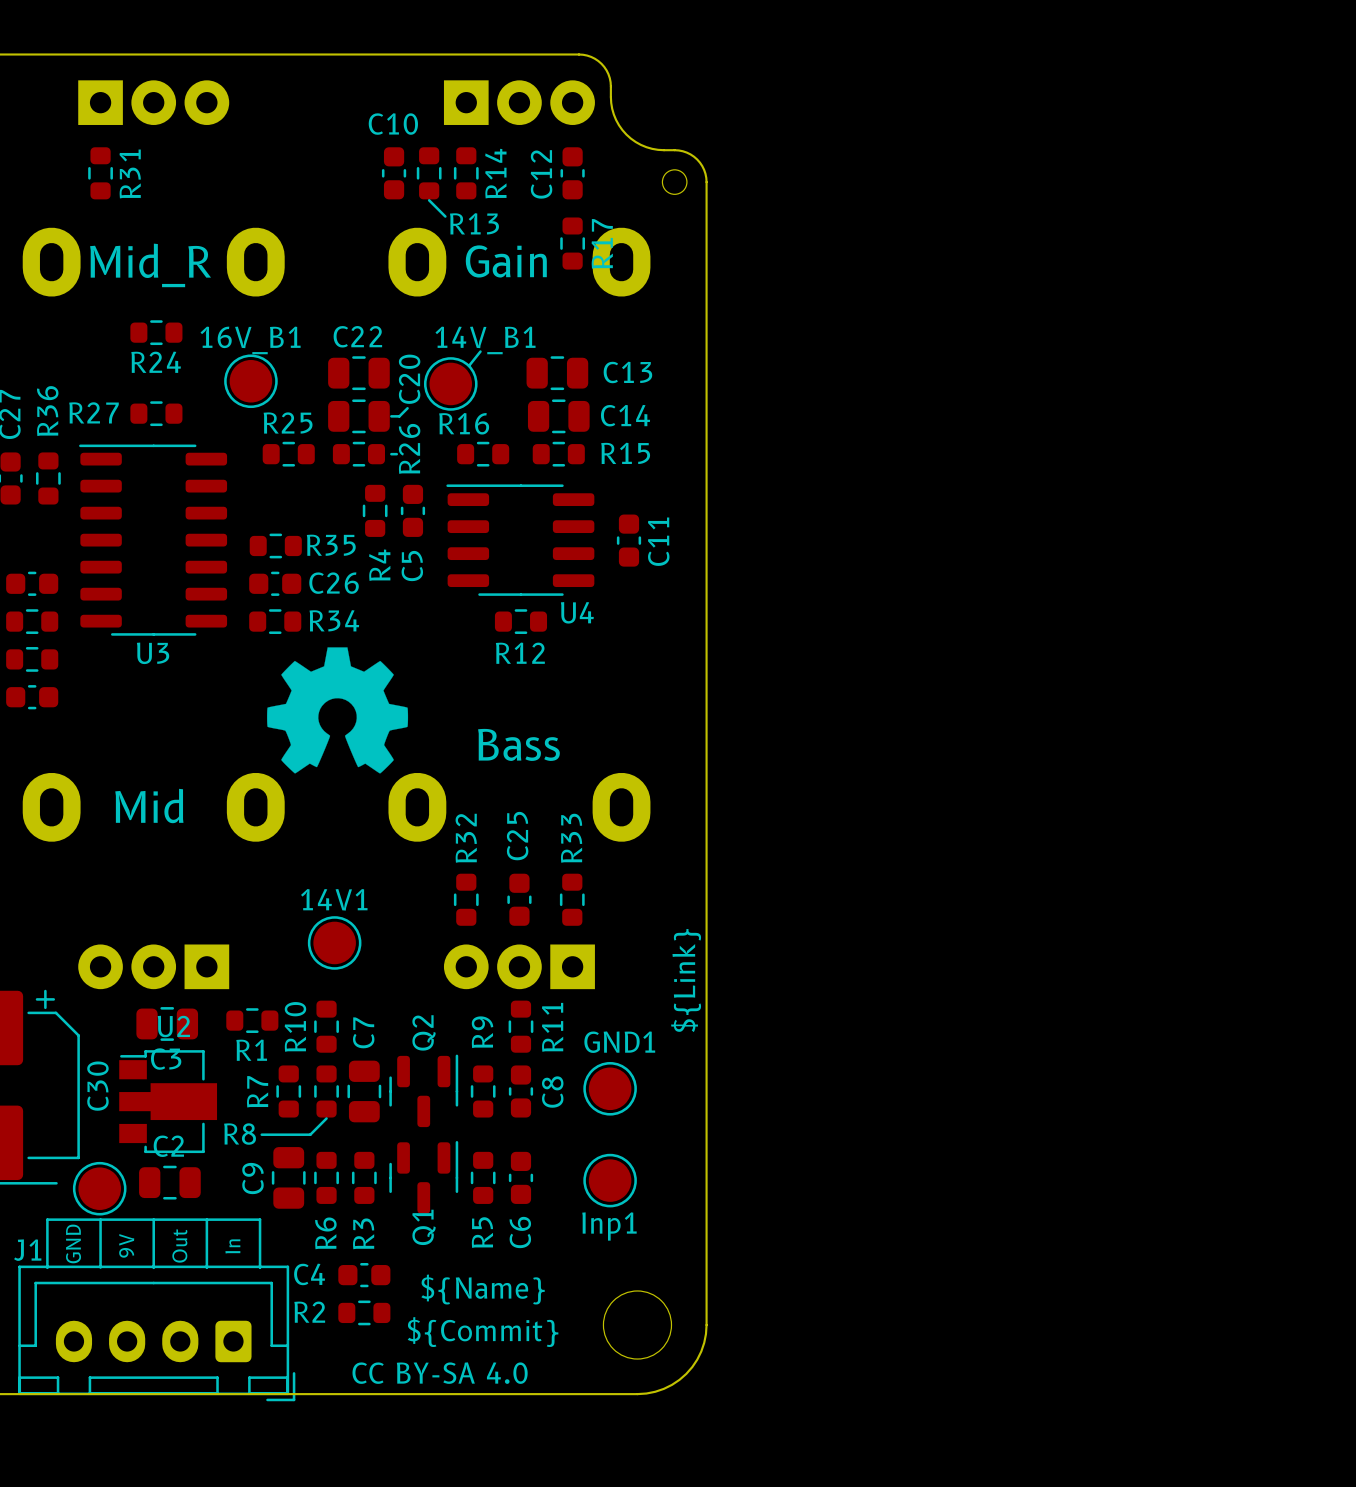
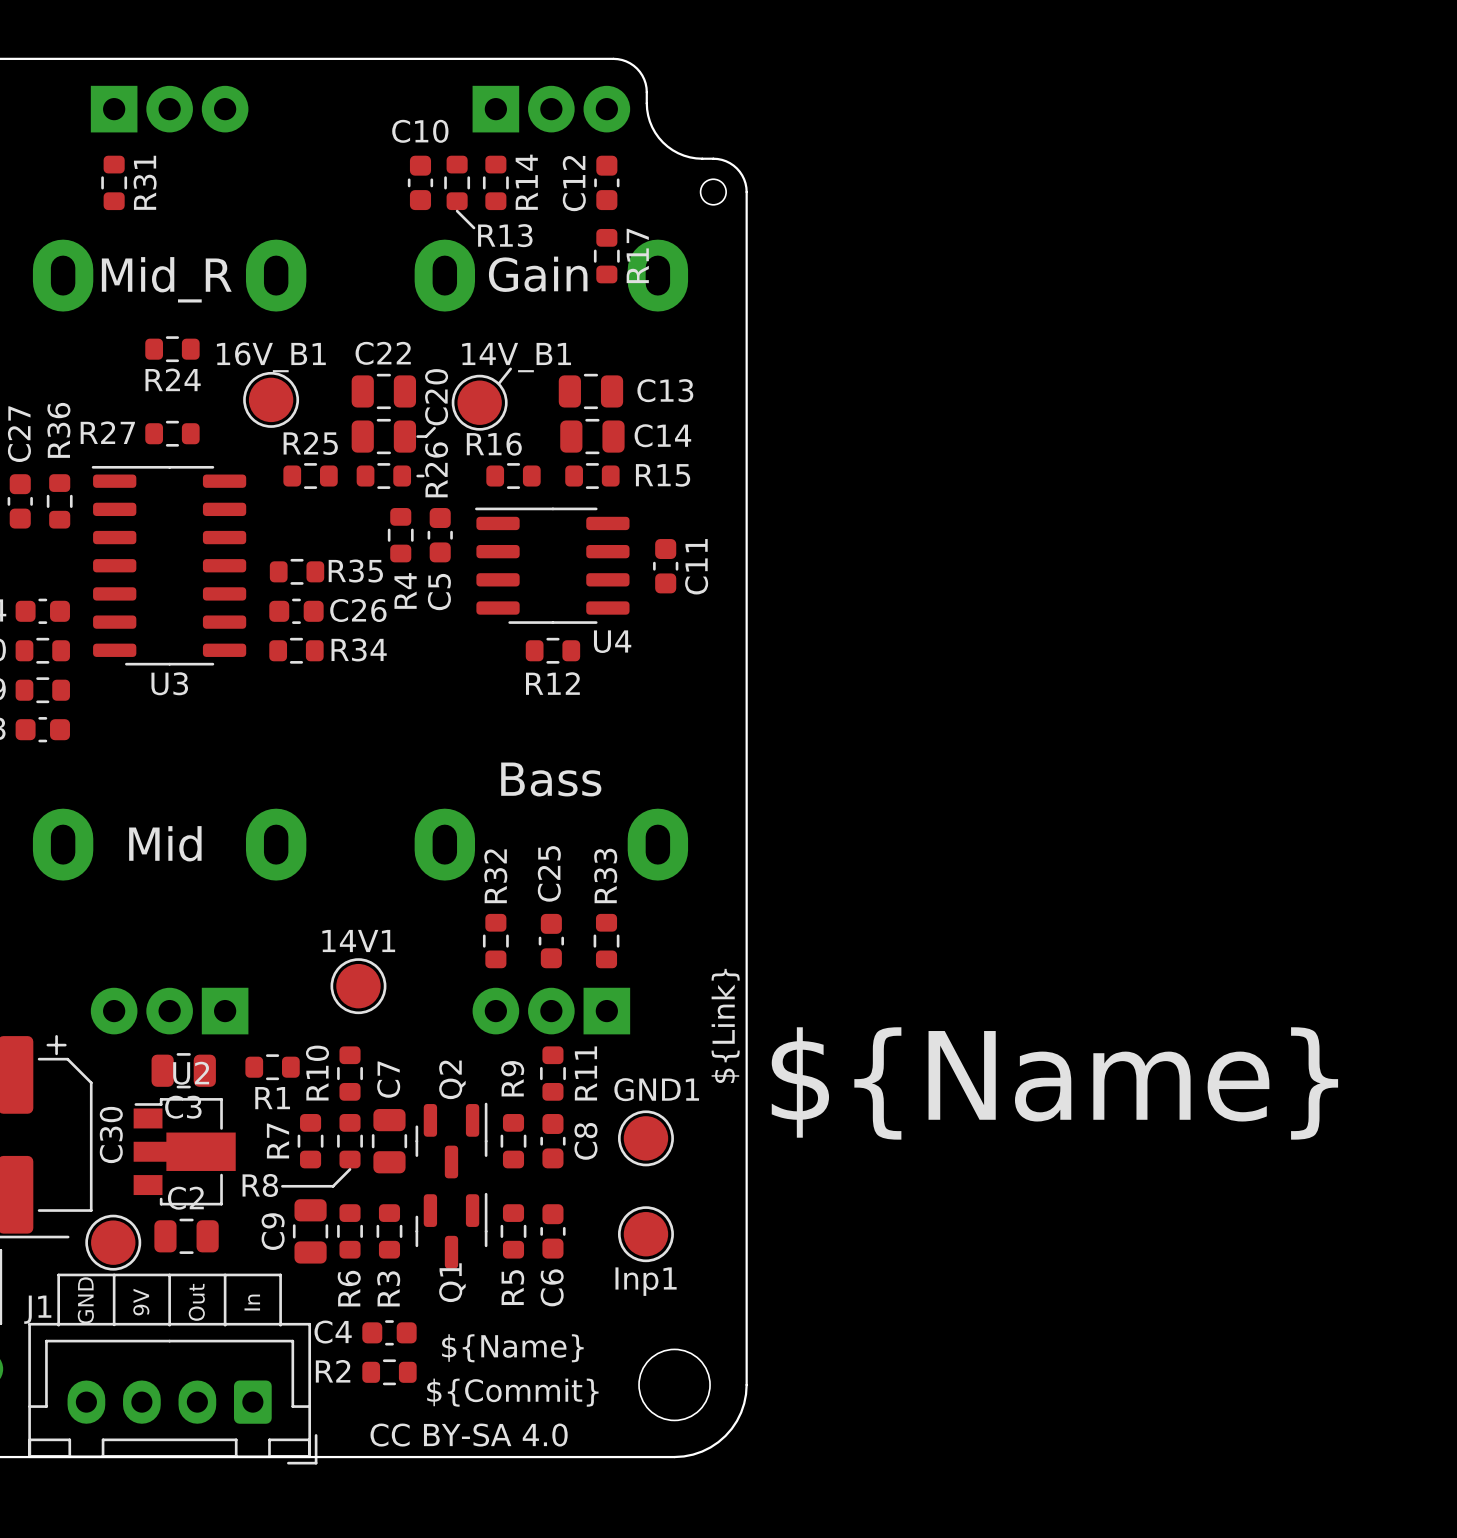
drawing: [267, 647, 409, 774] -> none
text: none -> ${Name} (1054, 1083)

